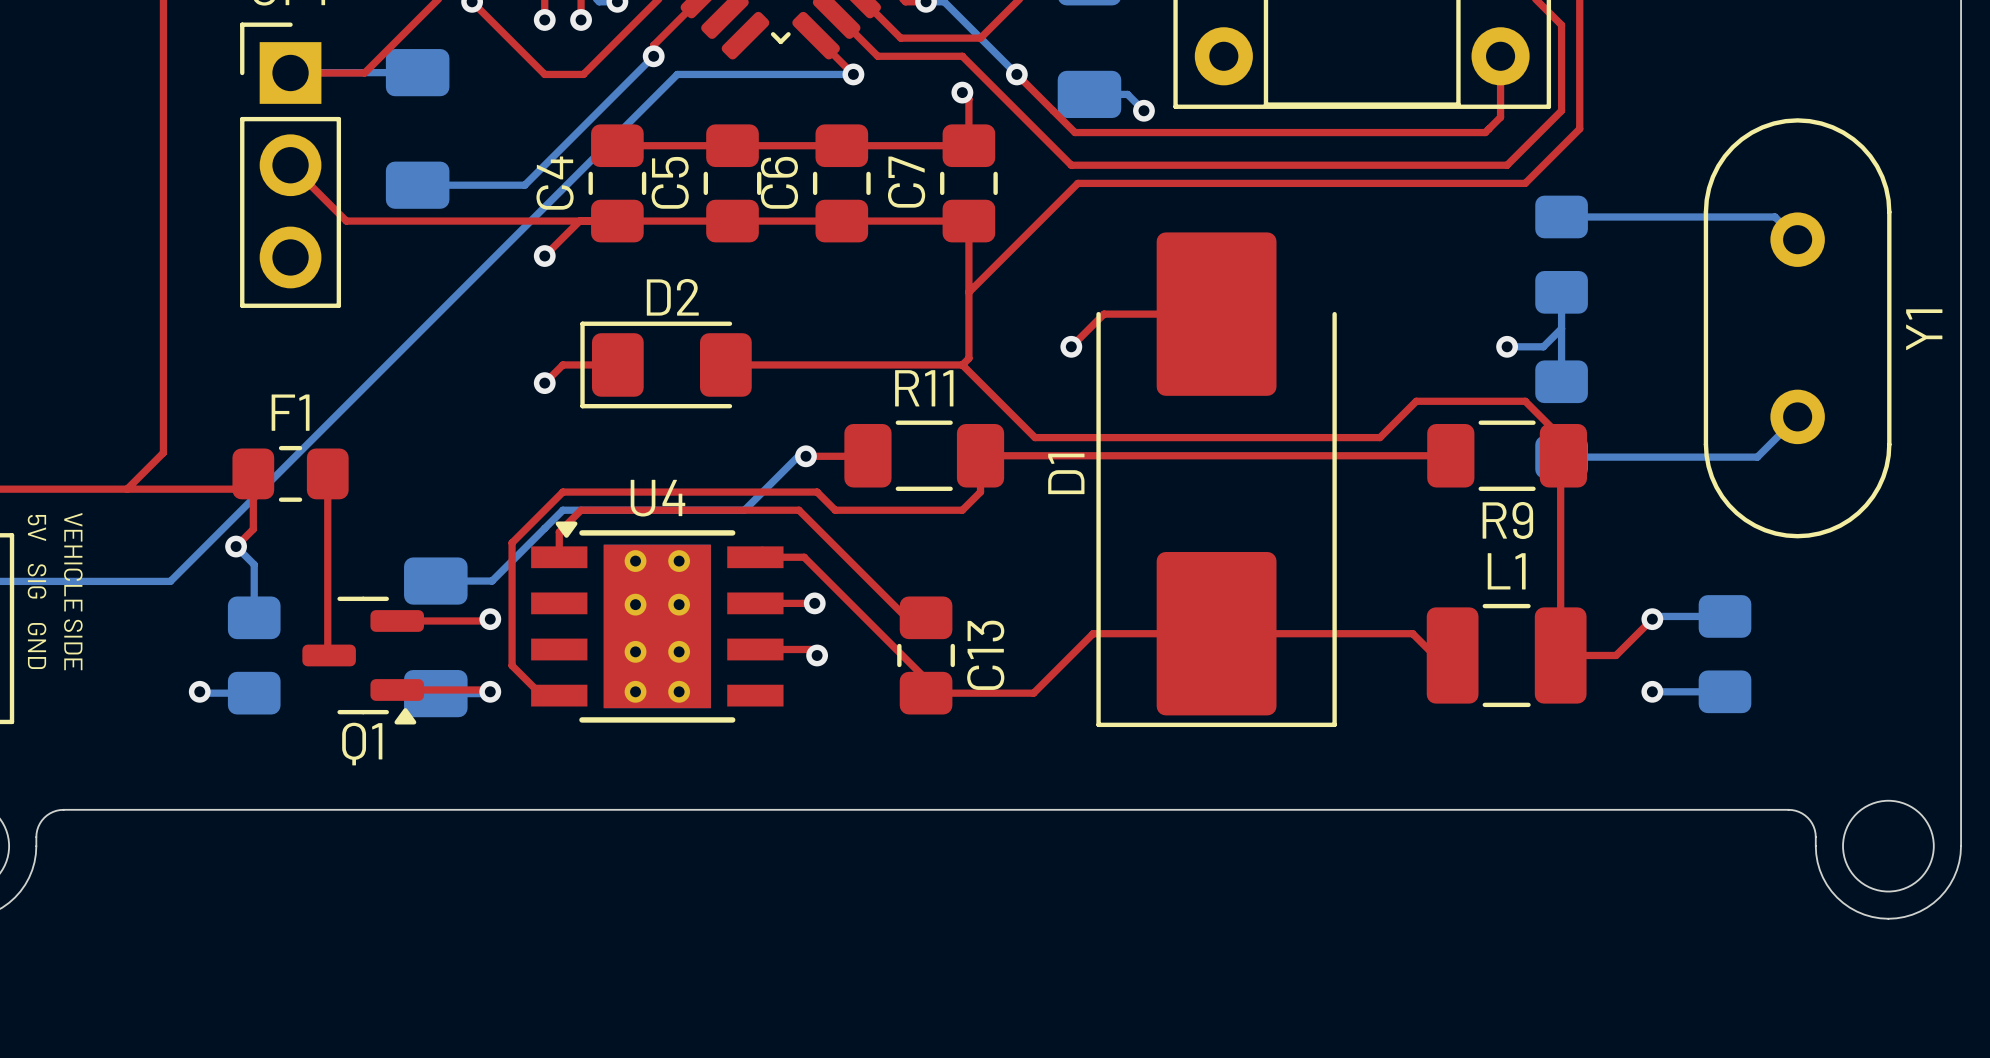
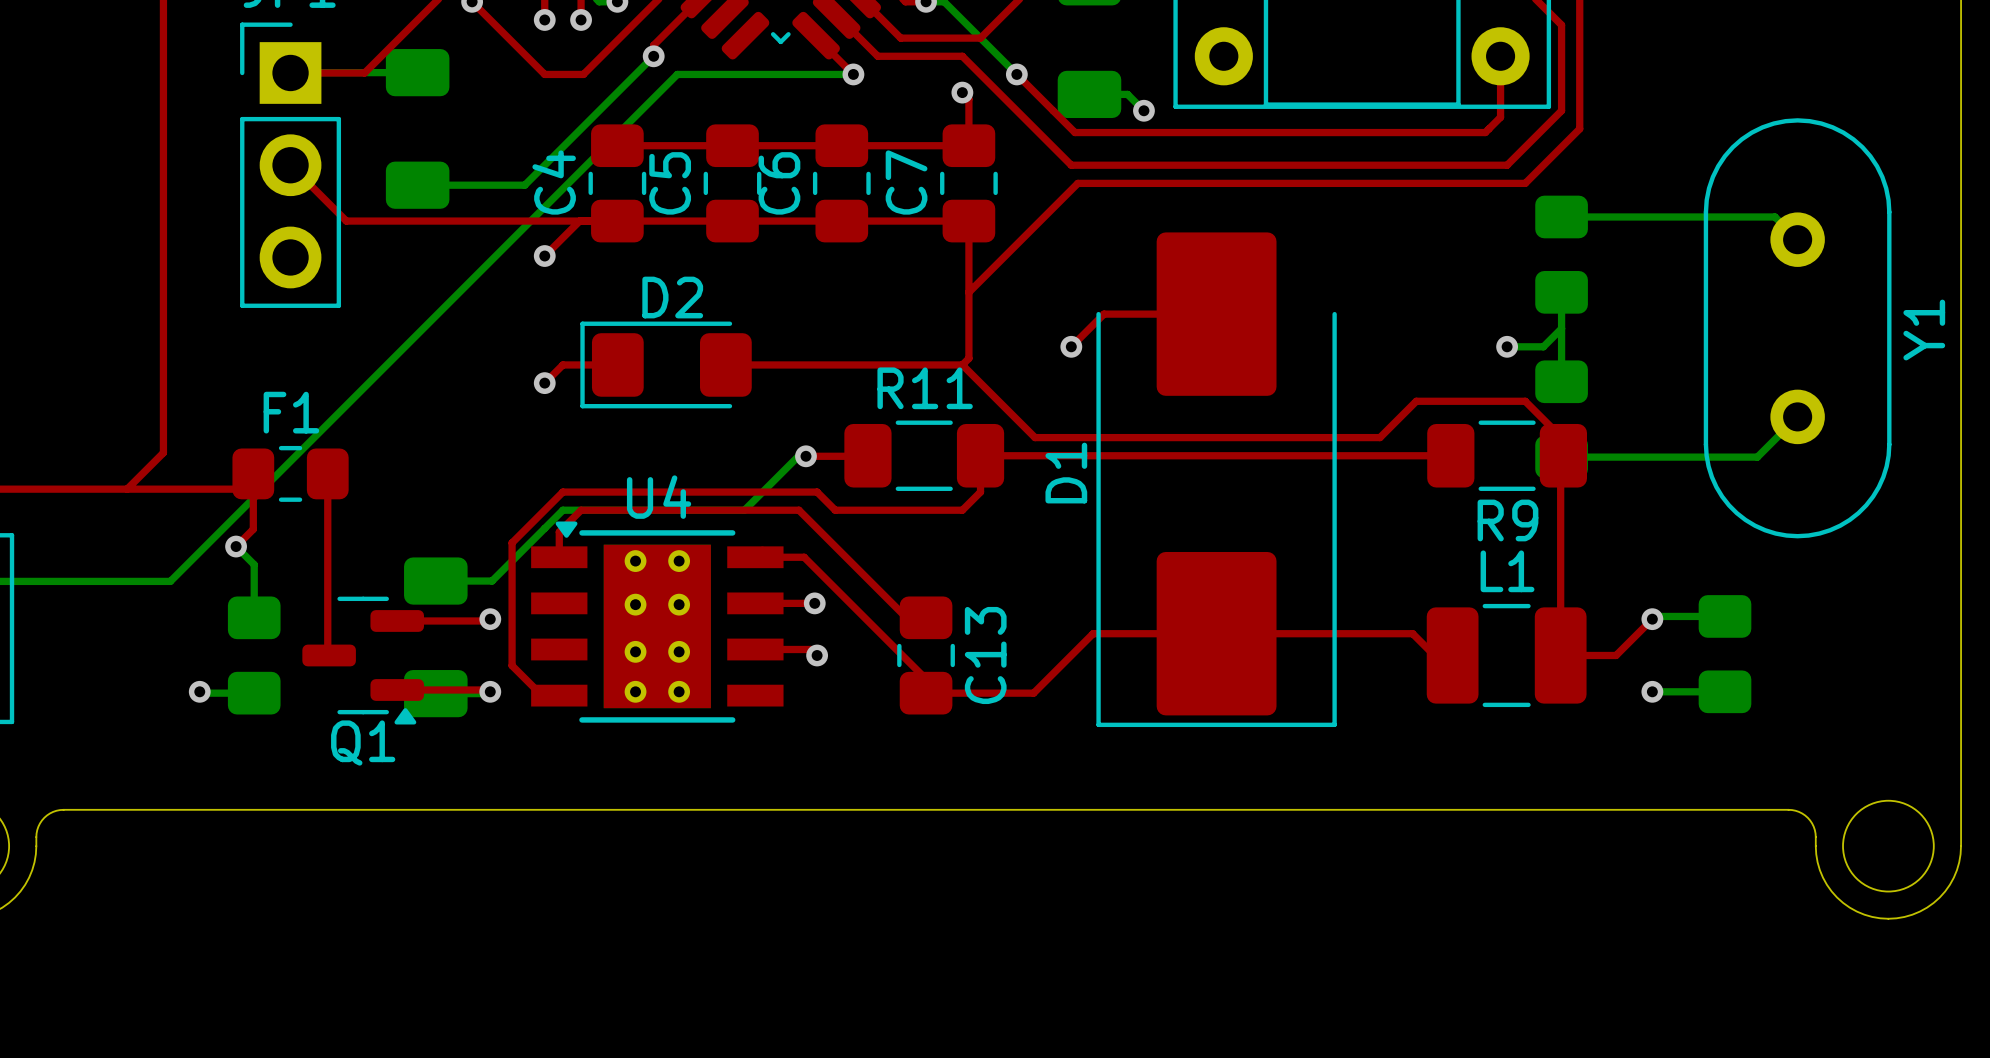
text: 5V SIG GND (37, 591) -> none
part value: VEHICLE SIDE (73, 591) -> none

